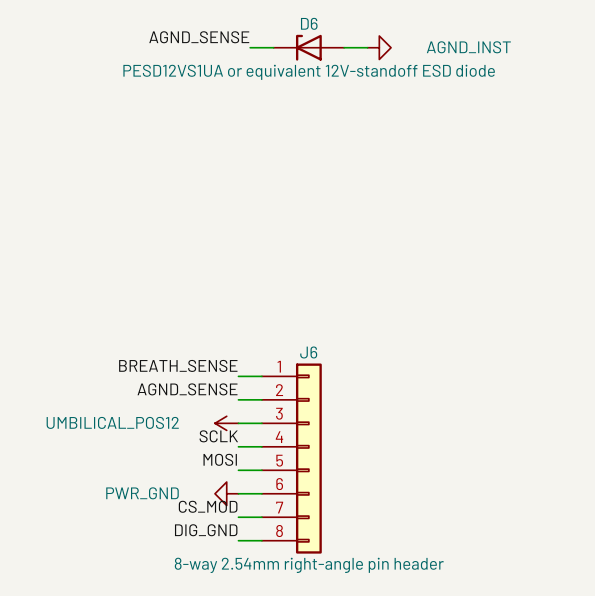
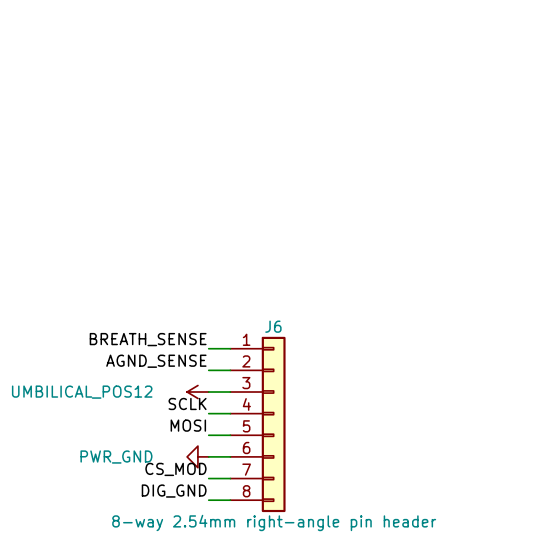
label: AGND_SENSE (199, 37) -> none
wire: (250, 47) (273, 47) -> none
D6: PESD12VS1UA or equivalent 12V-standoff ESD diode (308, 47) -> none
wire: (344, 47) (367, 47) -> none
power symbol: AGND_INST (379, 47) -> none

